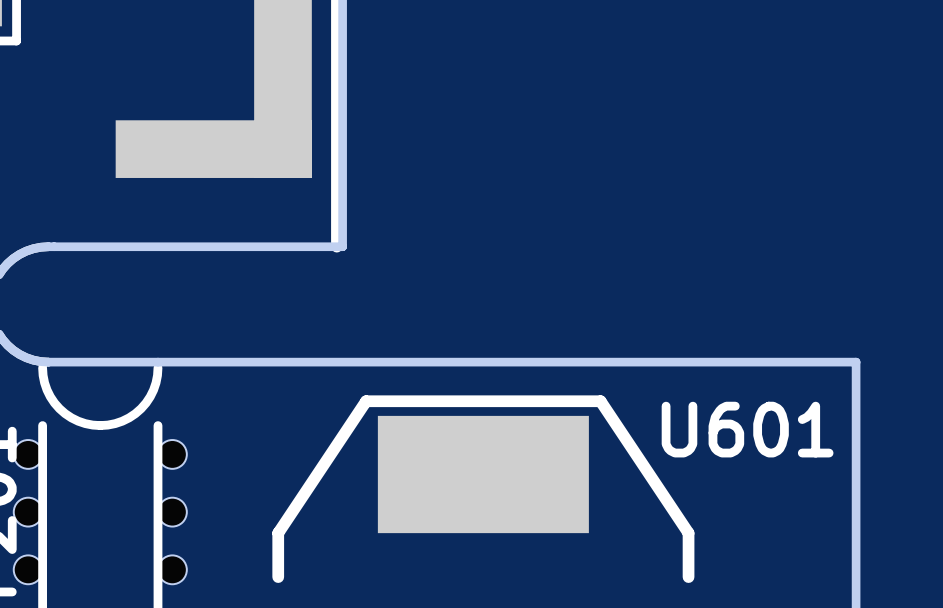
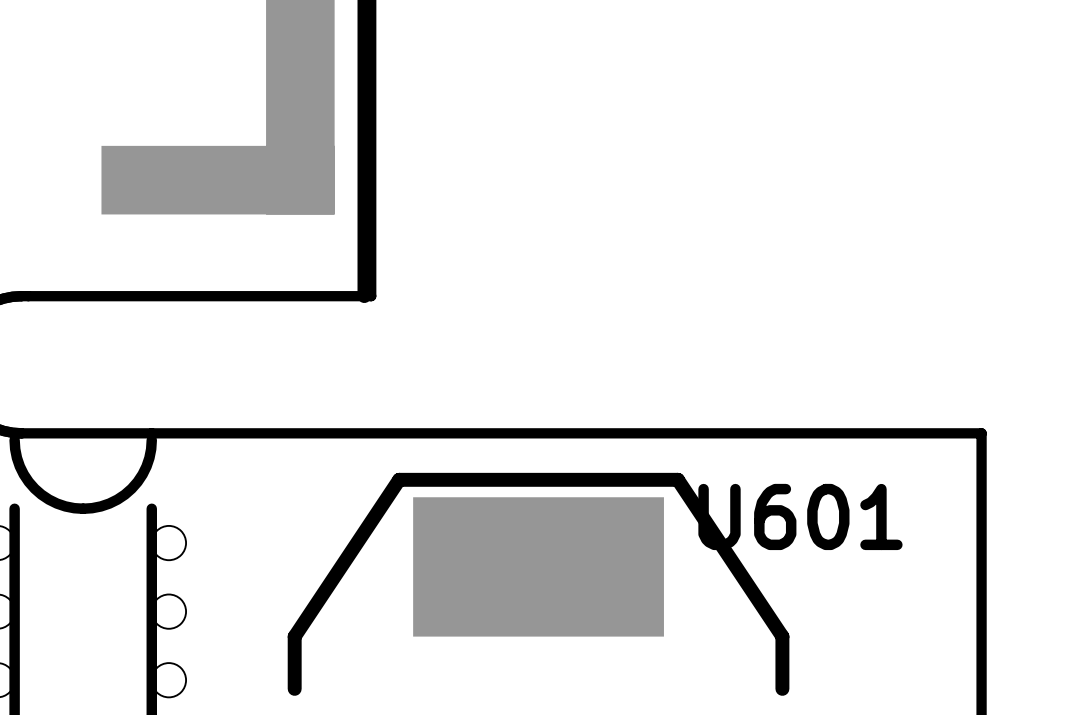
U601 name position: U601 (747, 429) -> U601 (800, 516)

